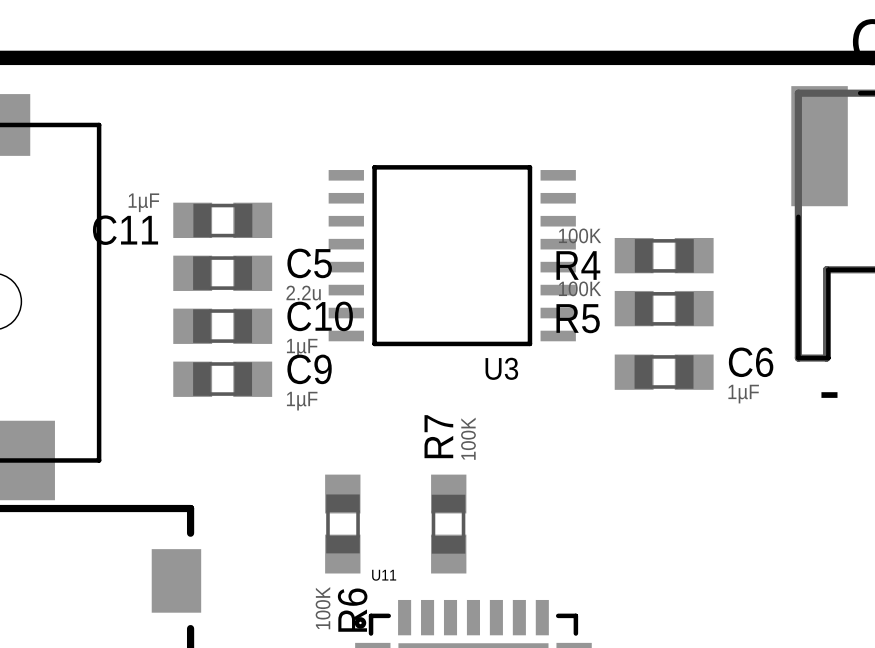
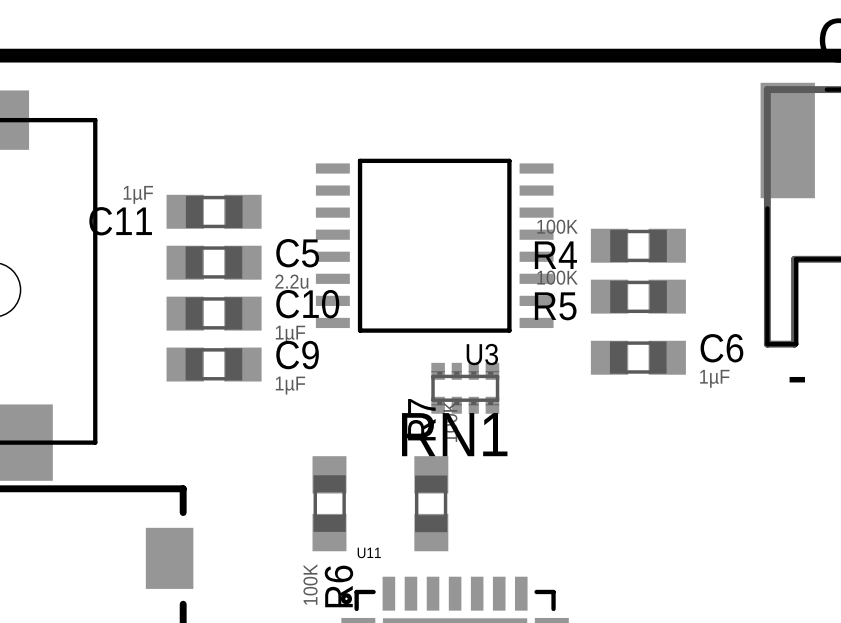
RN1: none -> (465, 388)

